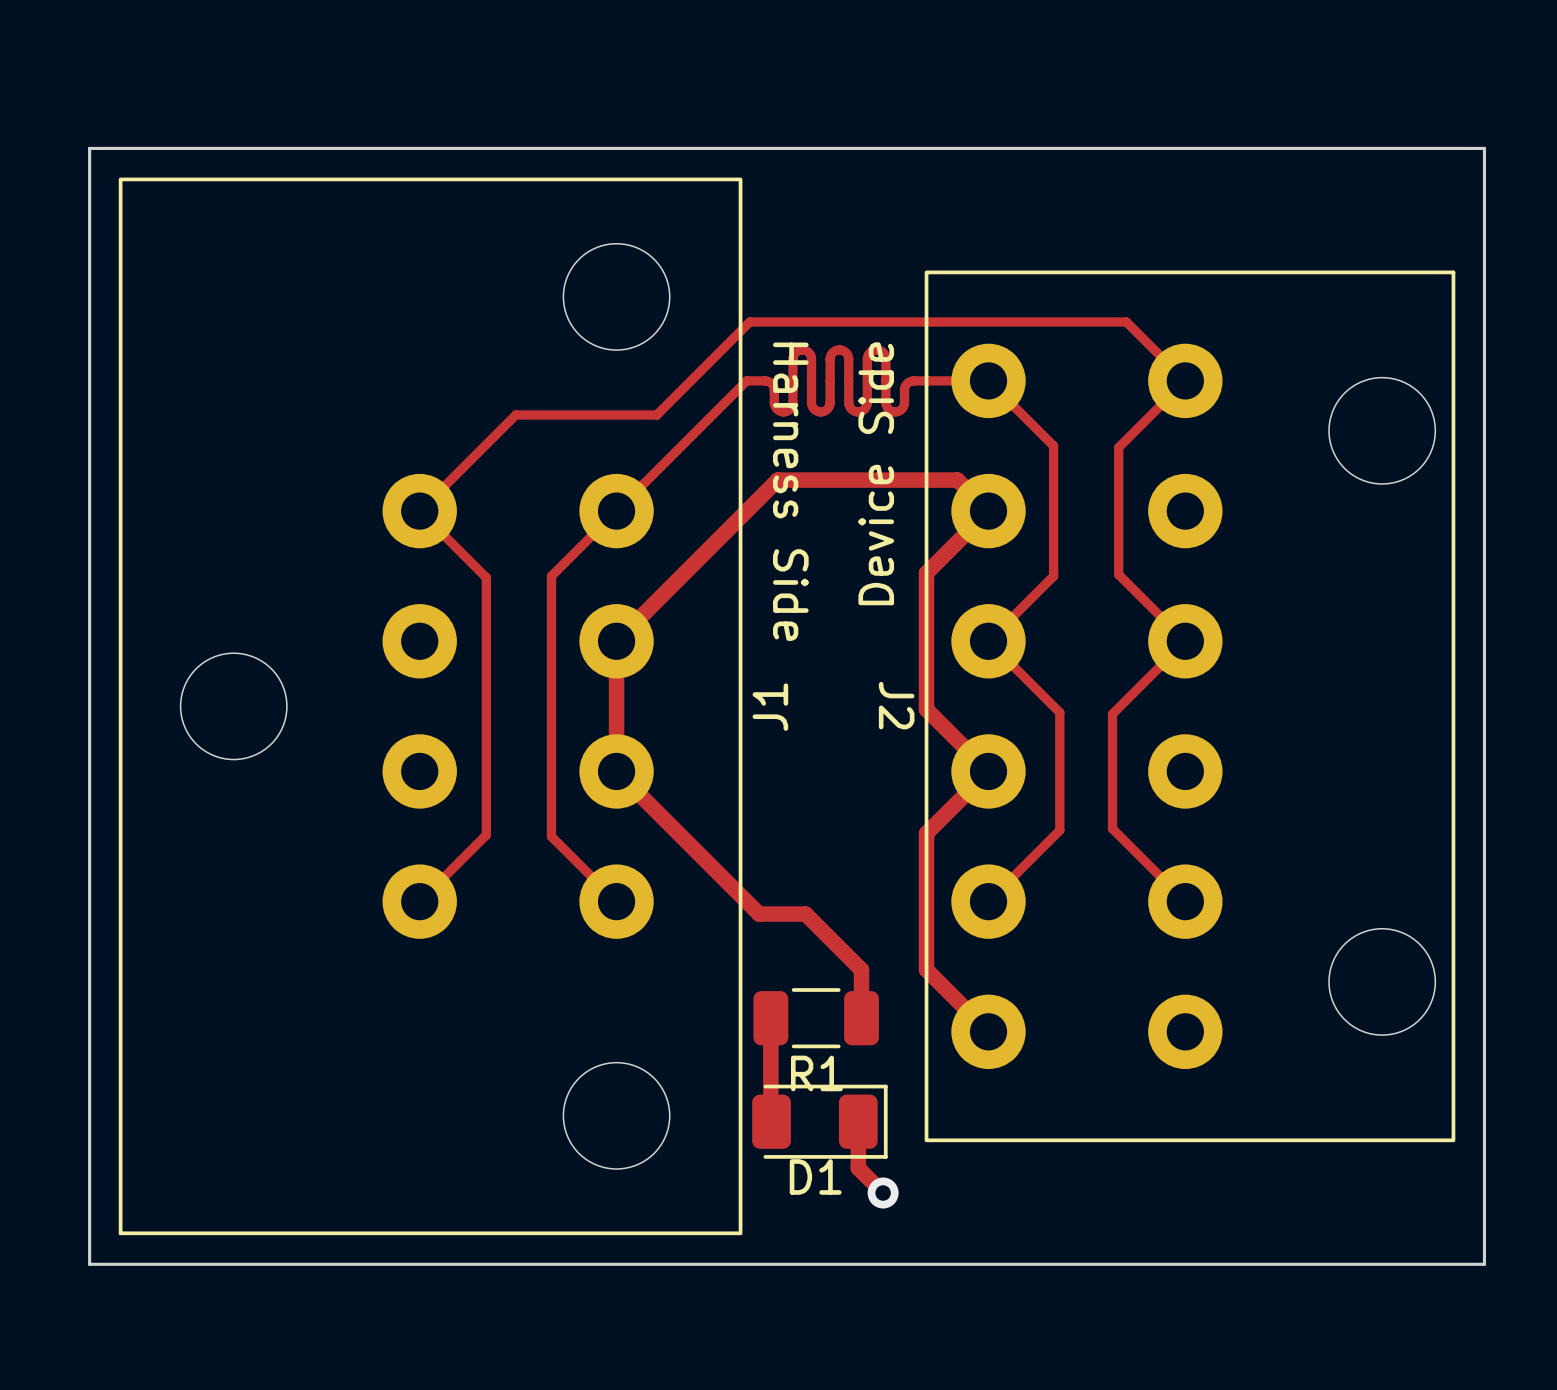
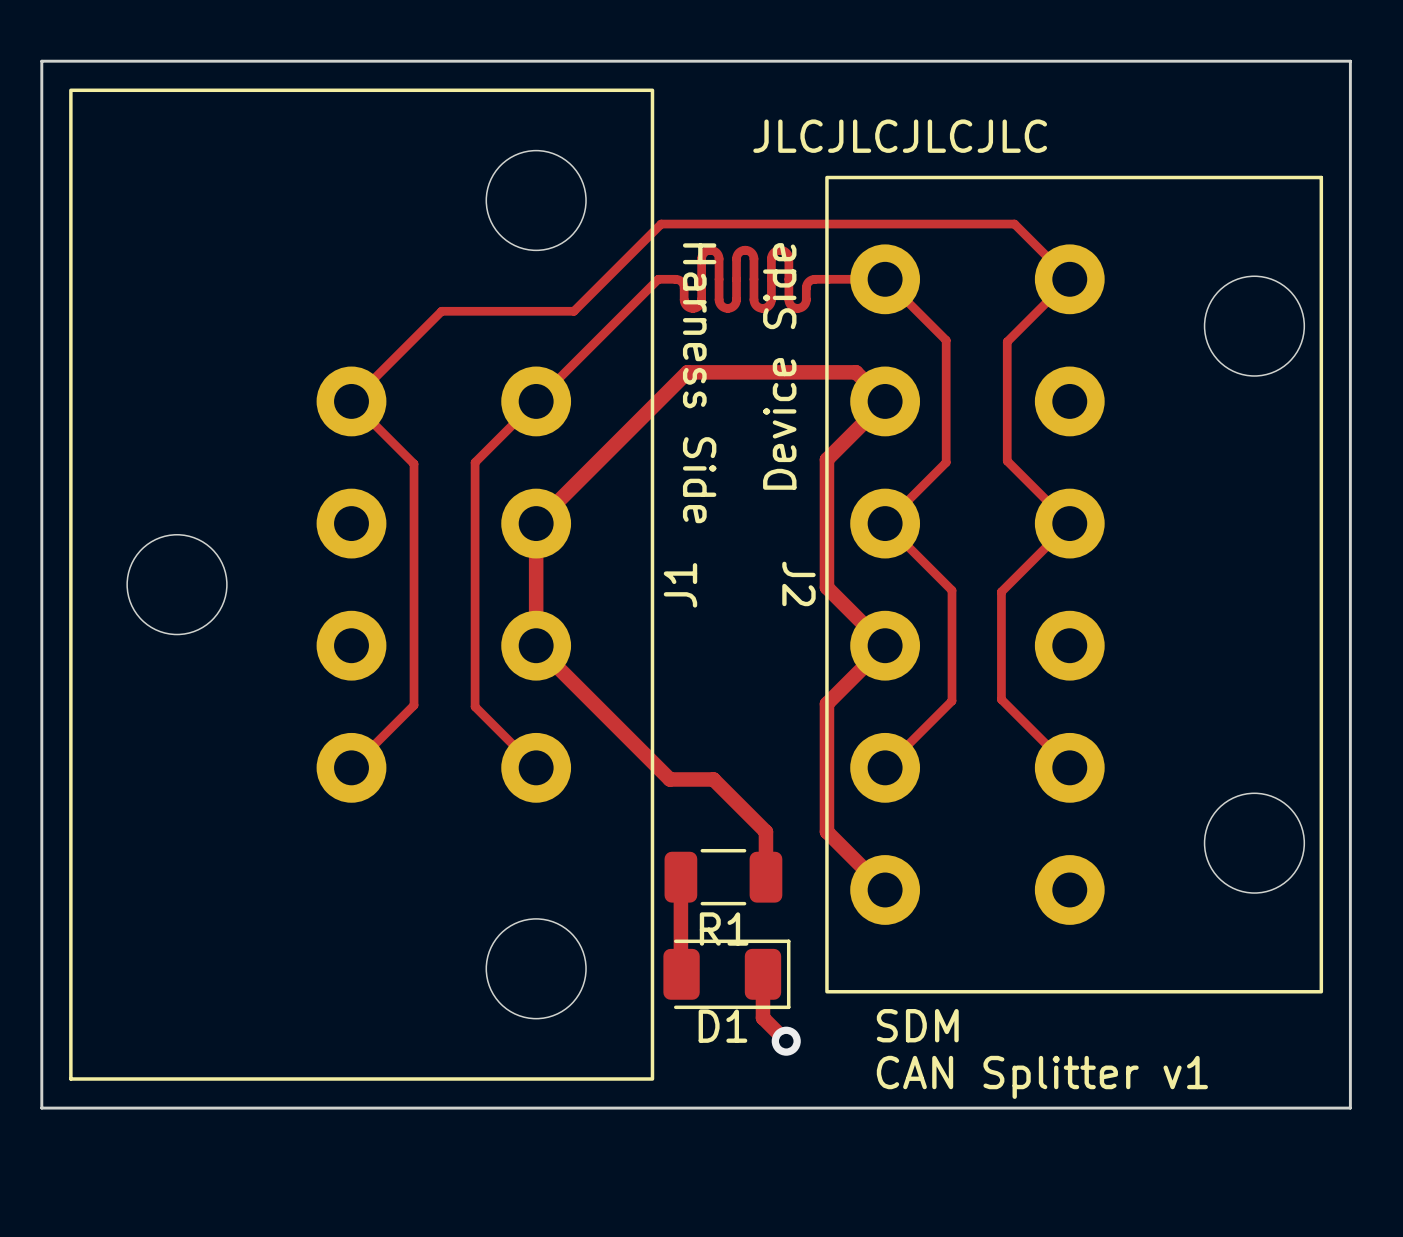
text: none -> JLCJLCJLCJLC (900, 136)
text: none -> SDM (917, 1025)
text: none -> CAN Splitter v1 (1042, 1077)

